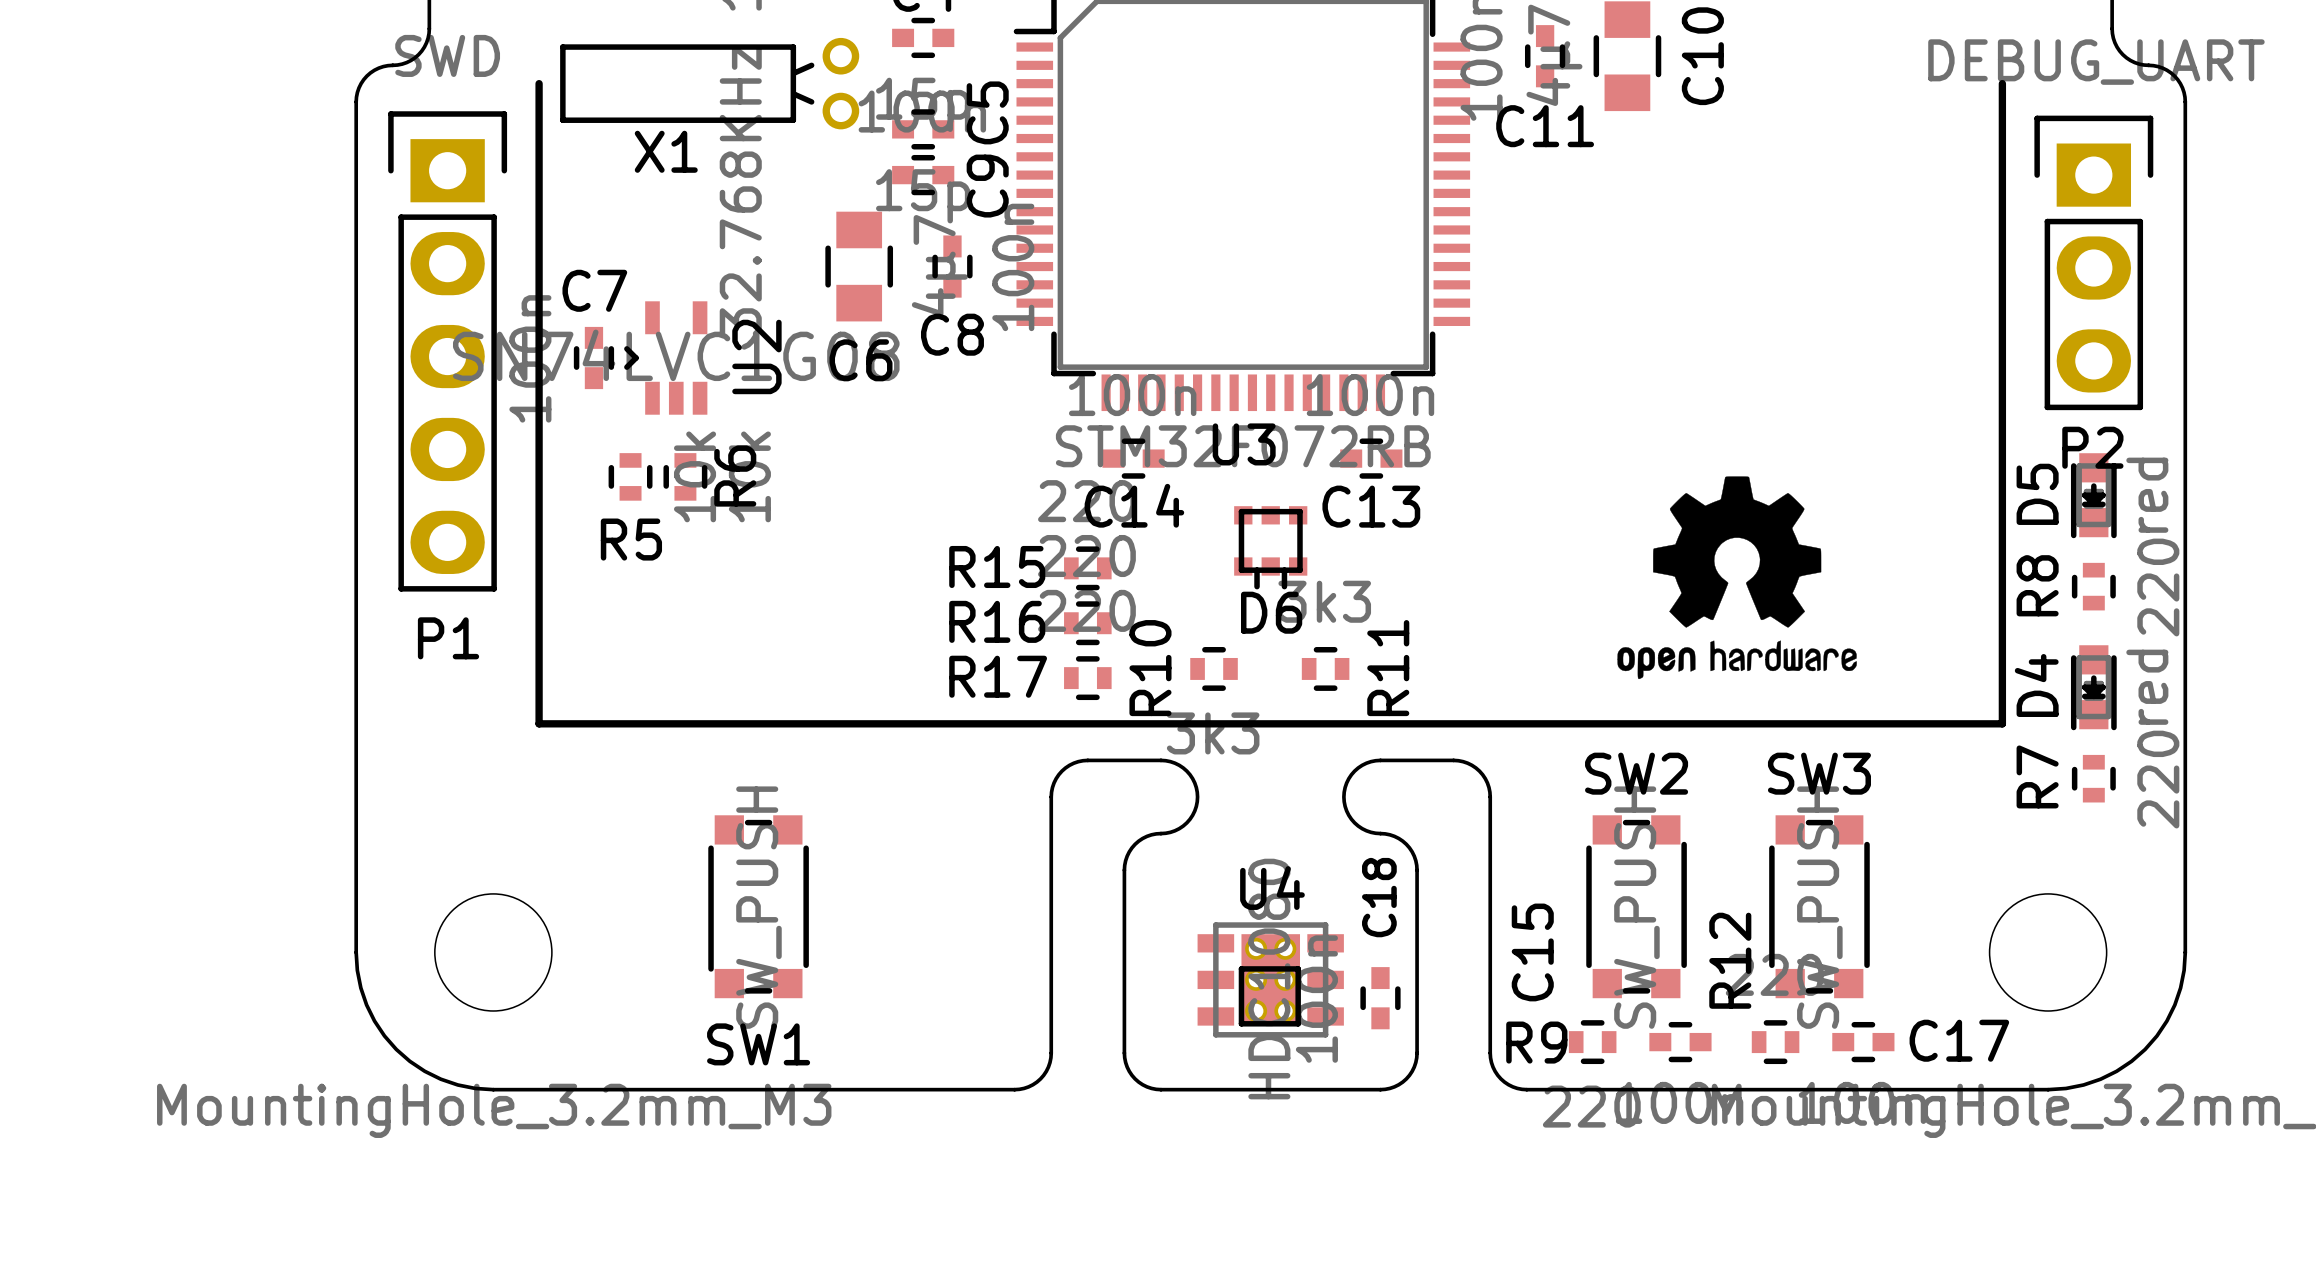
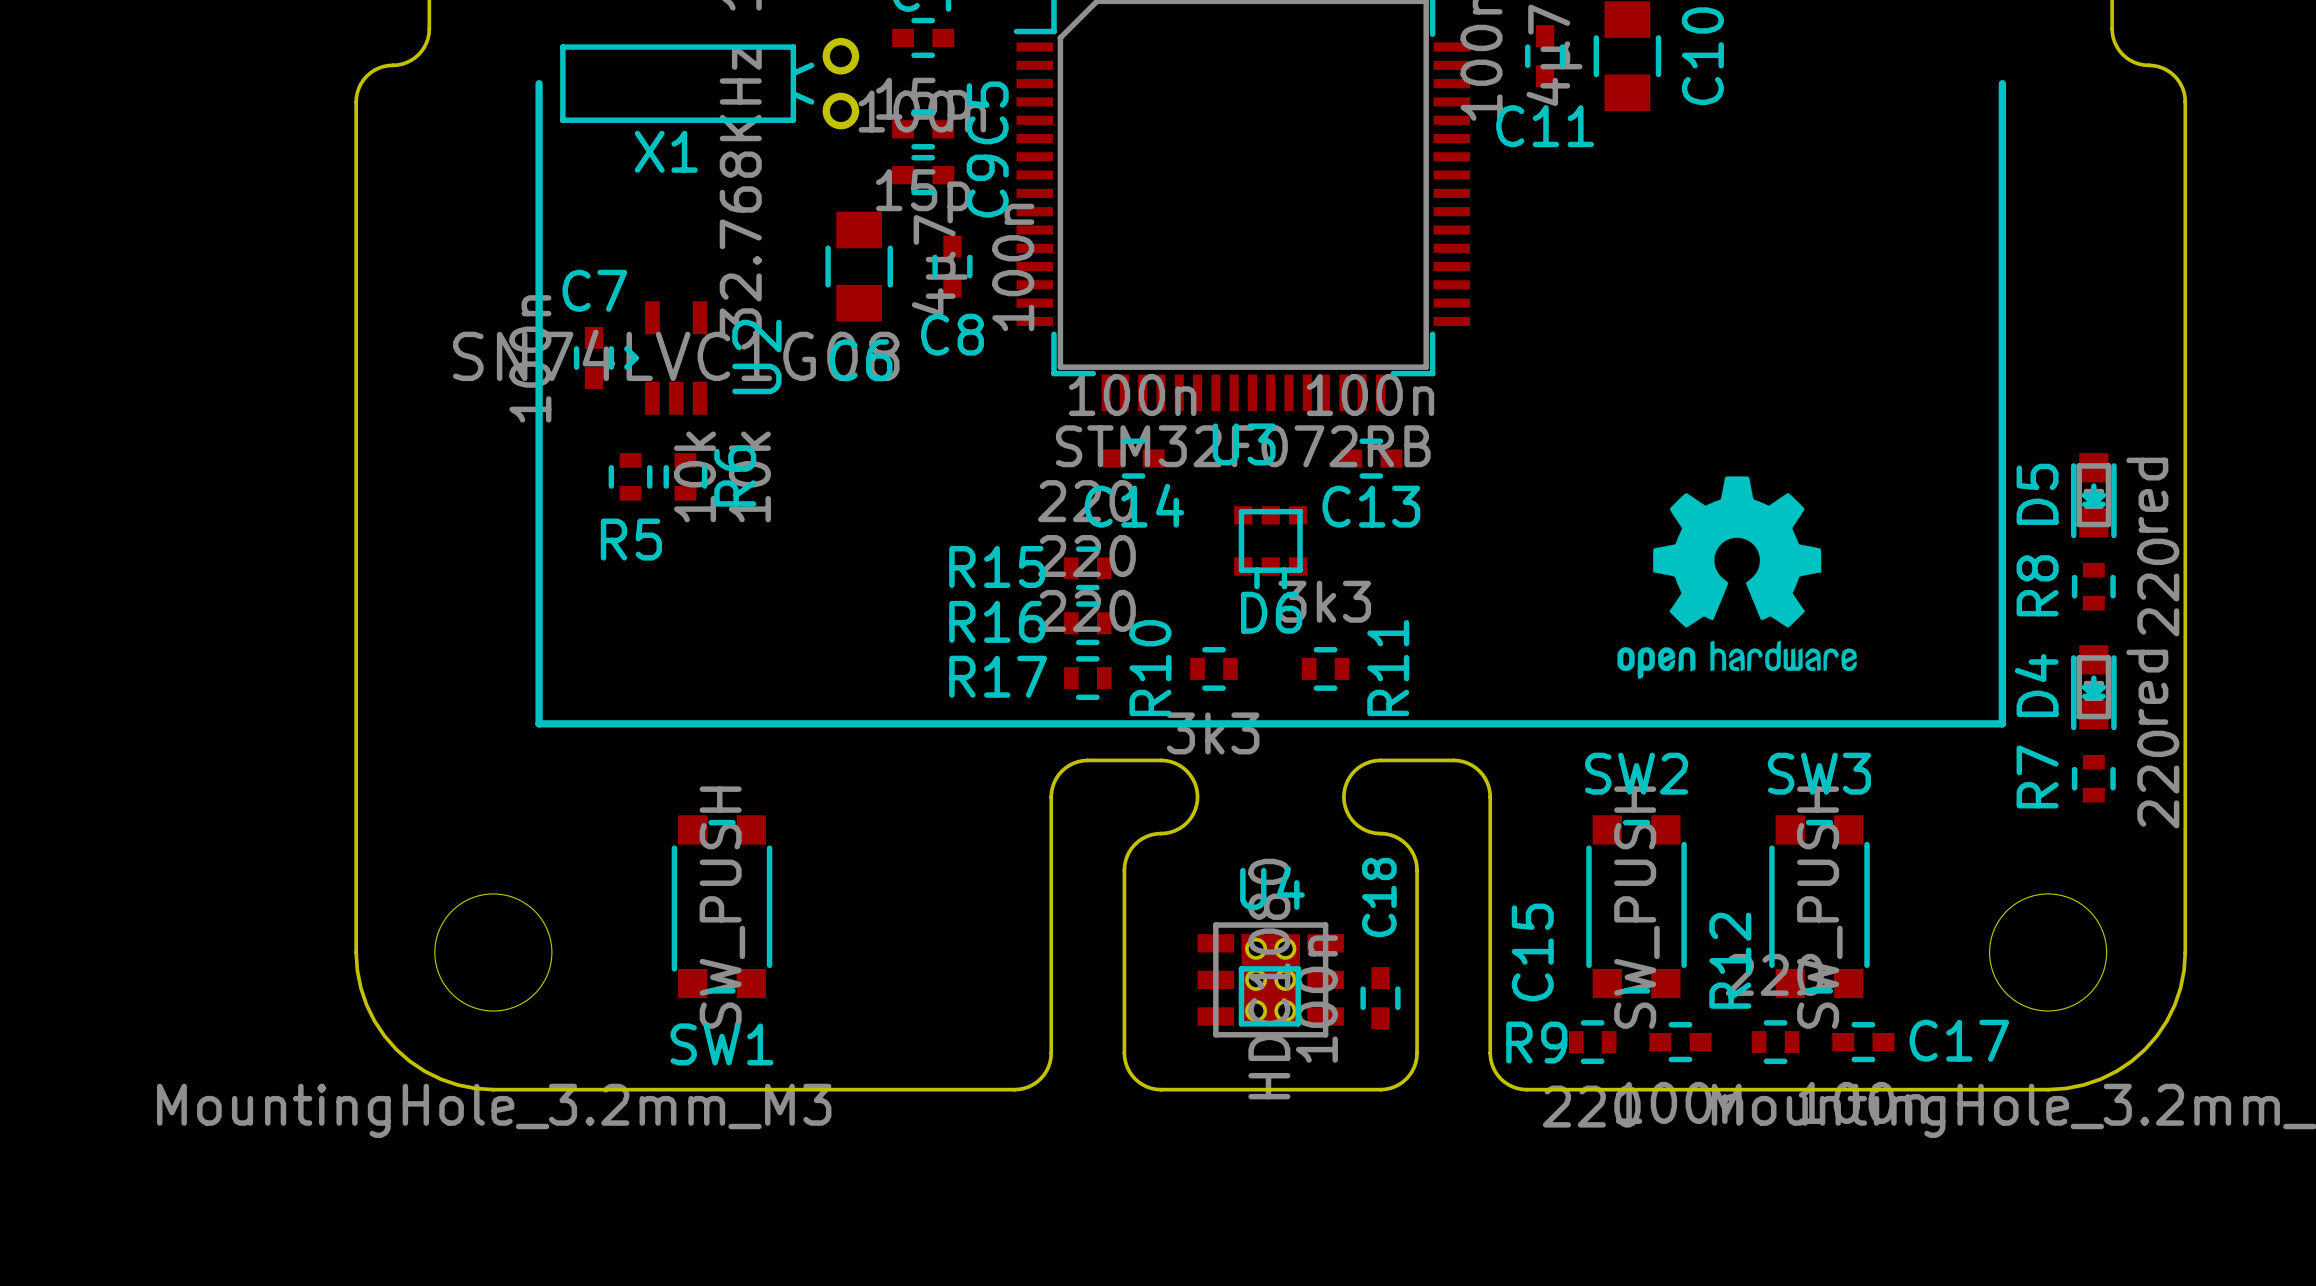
P2: DEBUG_UART (2093, 262) -> none
P1: SWD (447, 351) -> none
SW1 position: (758, 906) -> (722, 906)

